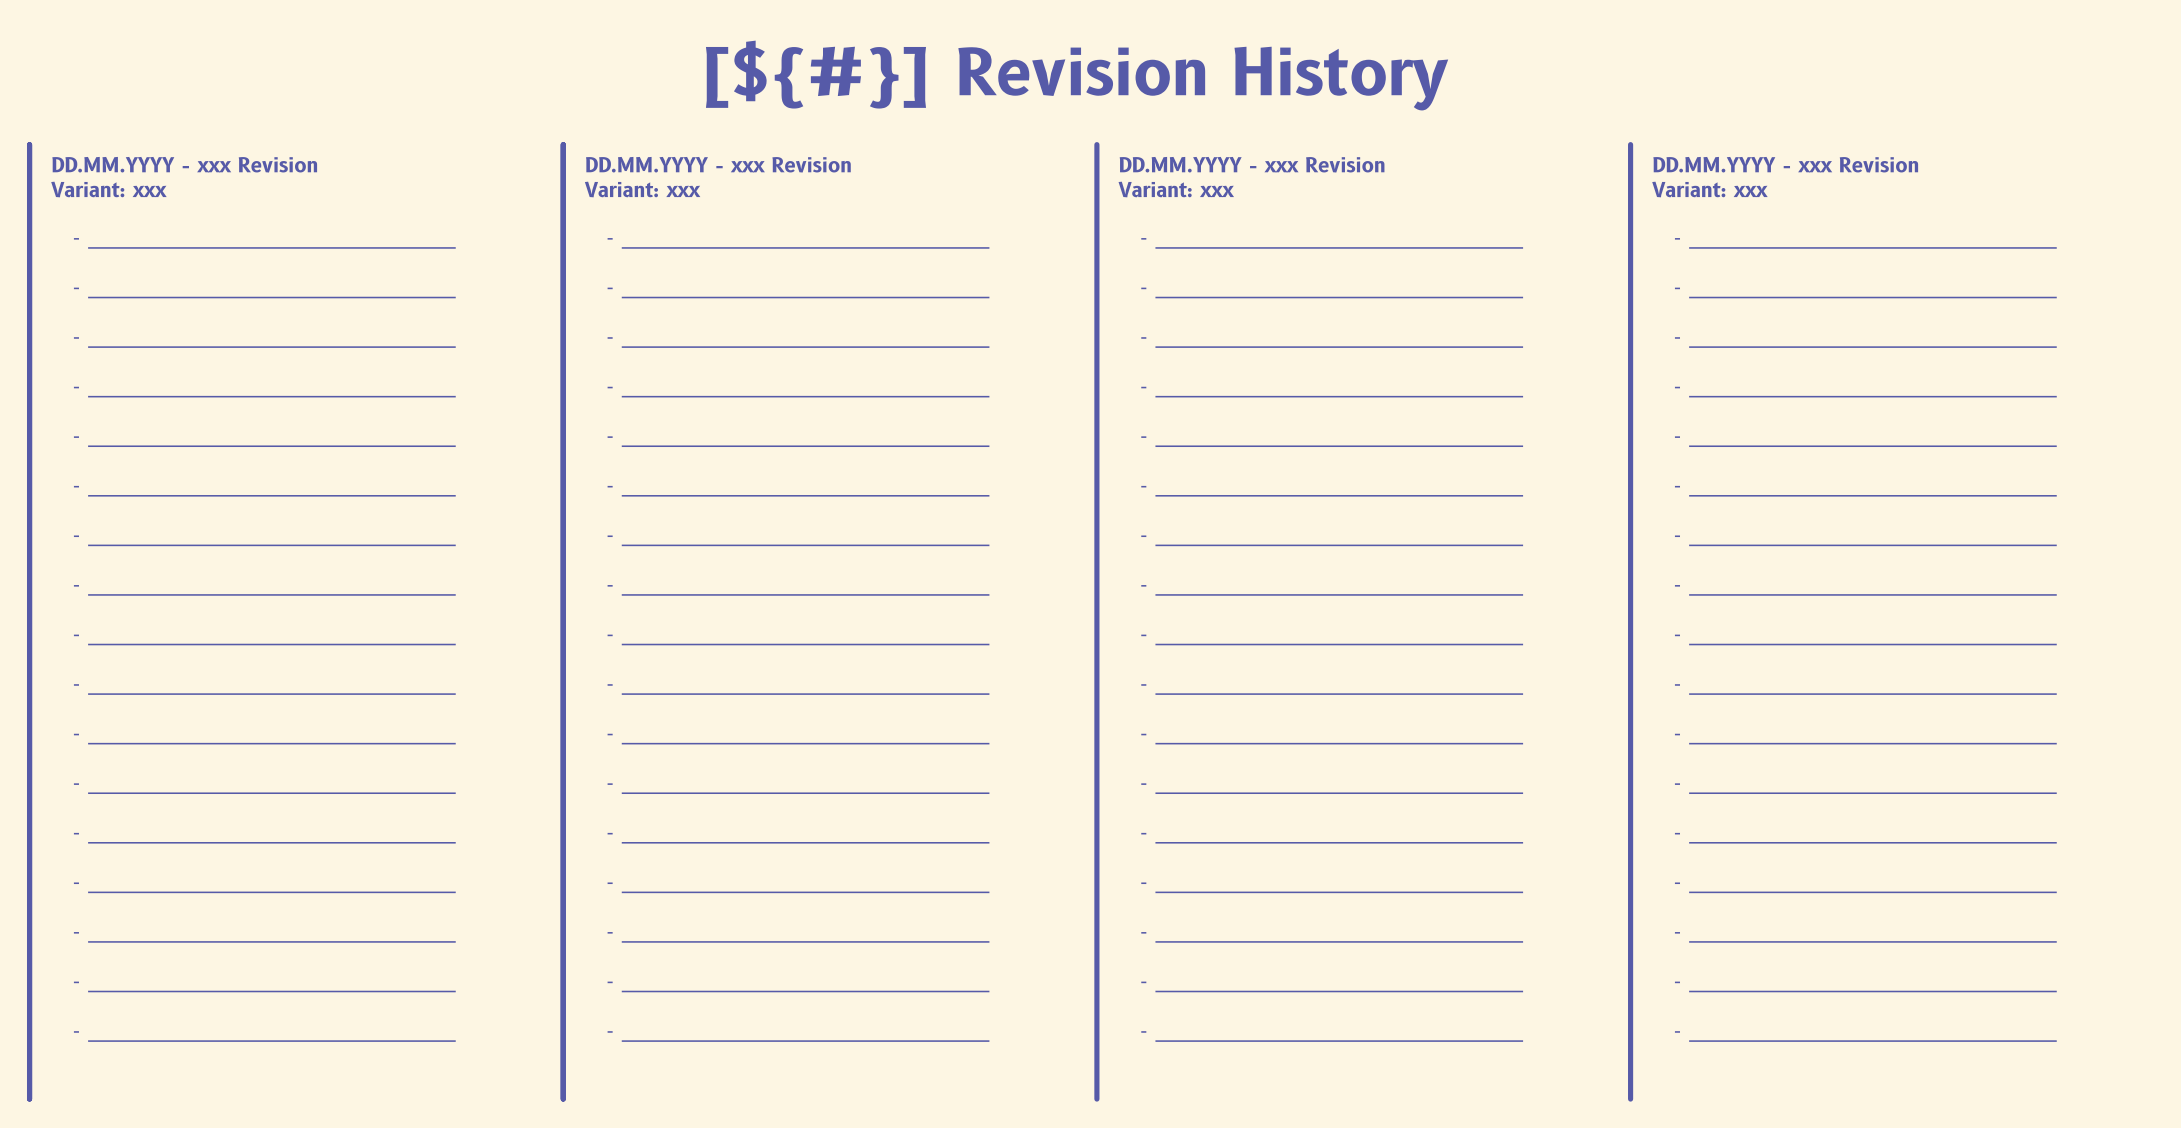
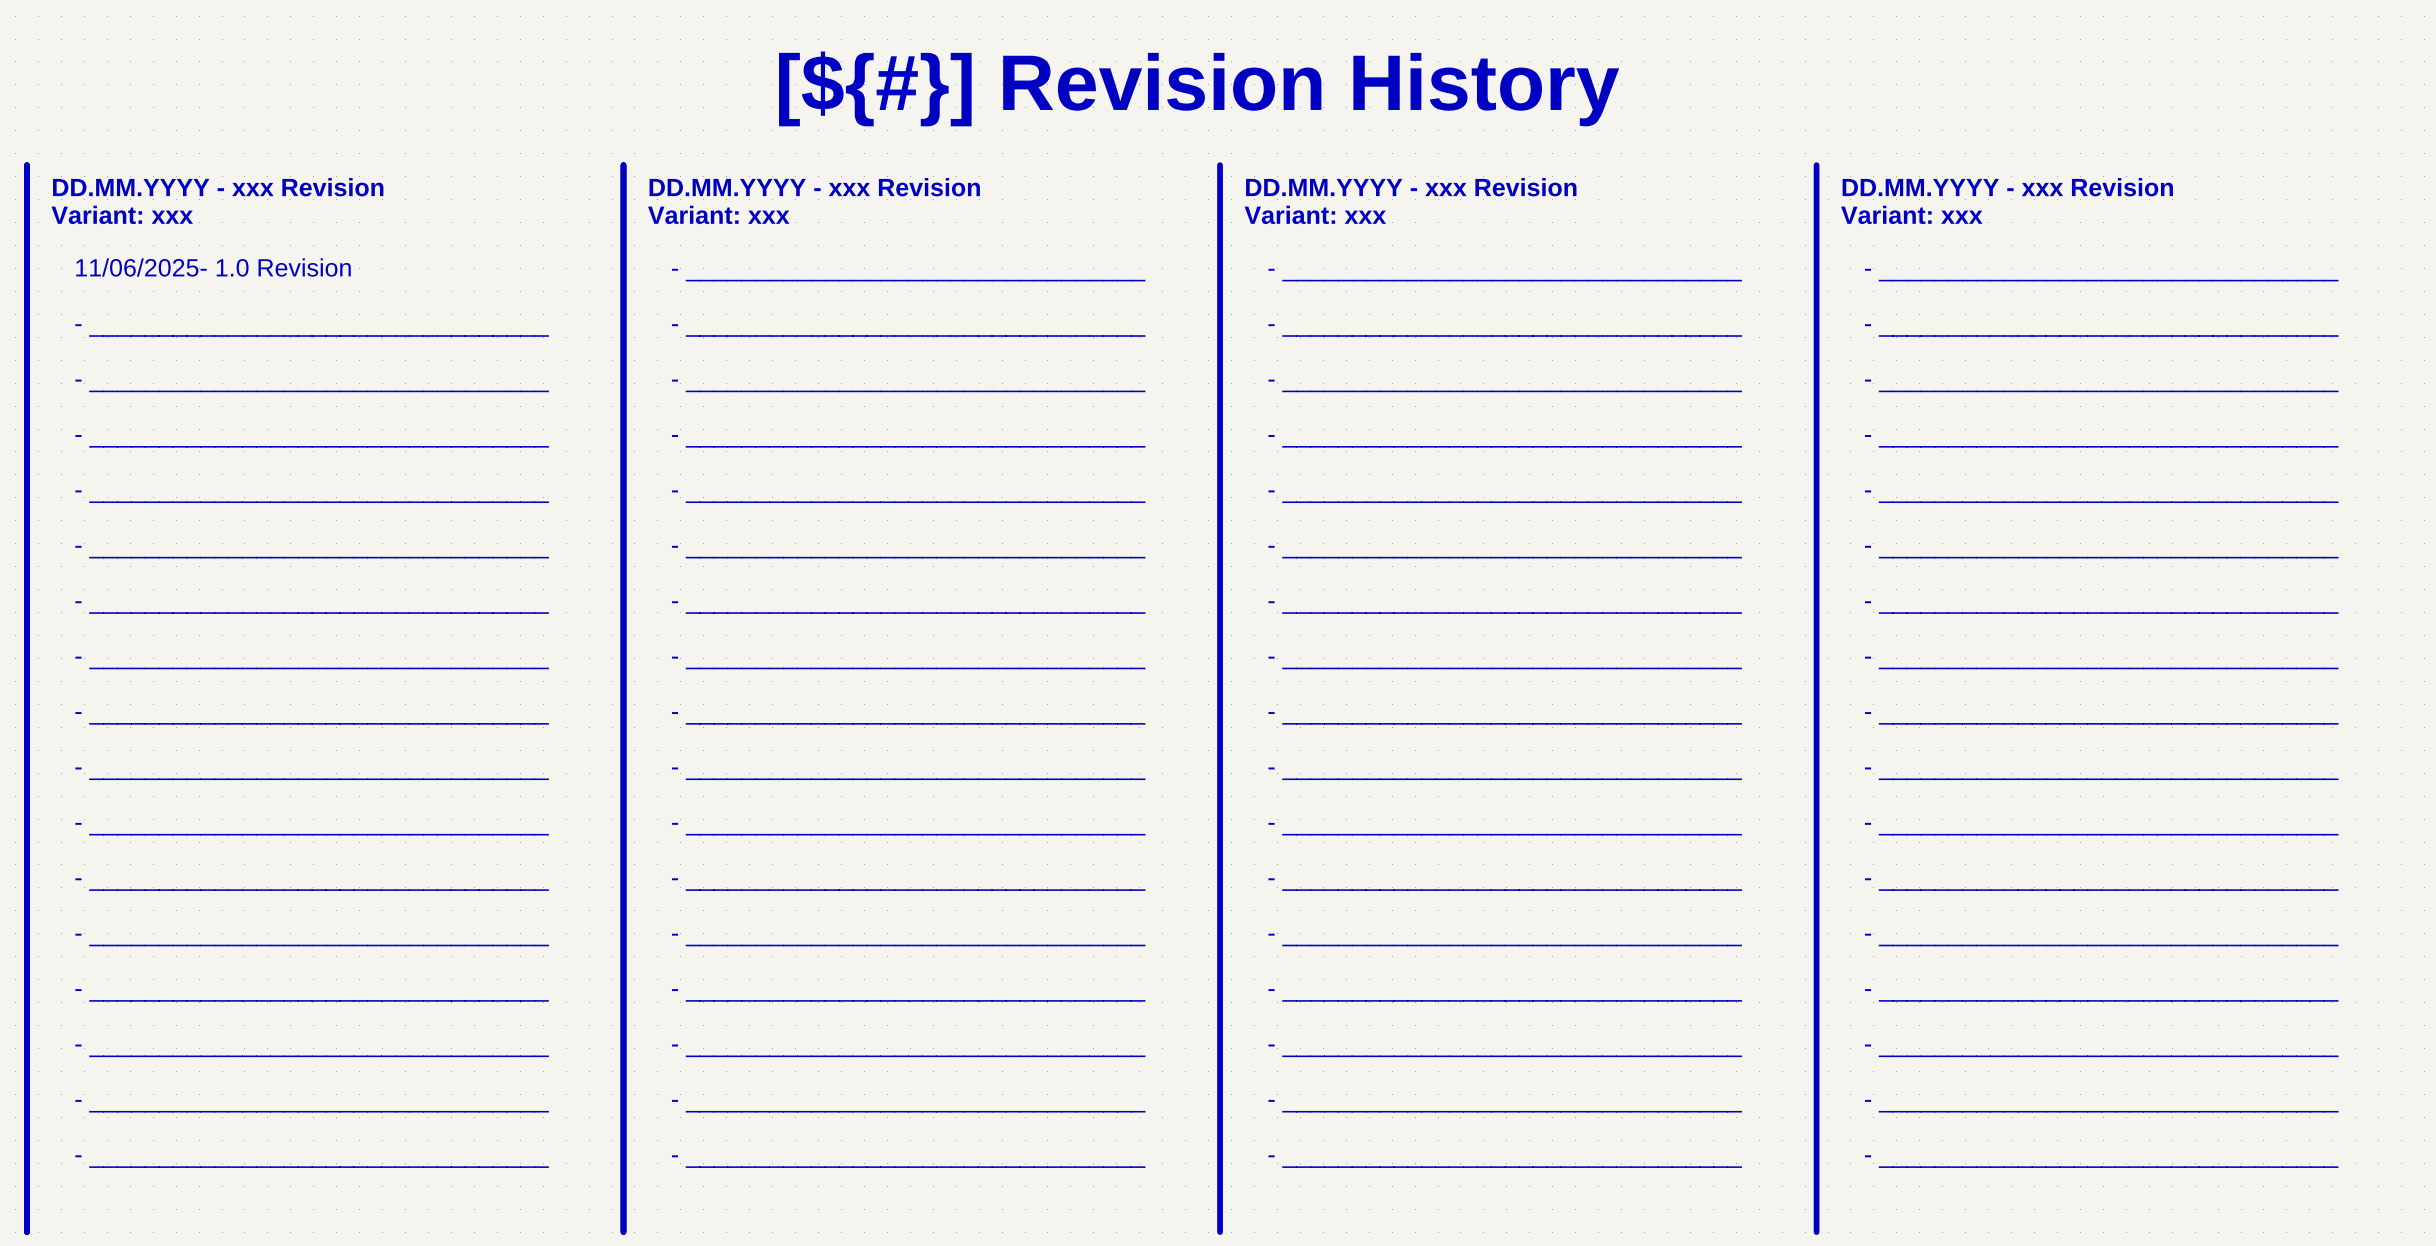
text: - _________________________________ (264, 243) -> 11/06/2025- 1.0 Revision (213, 267)

